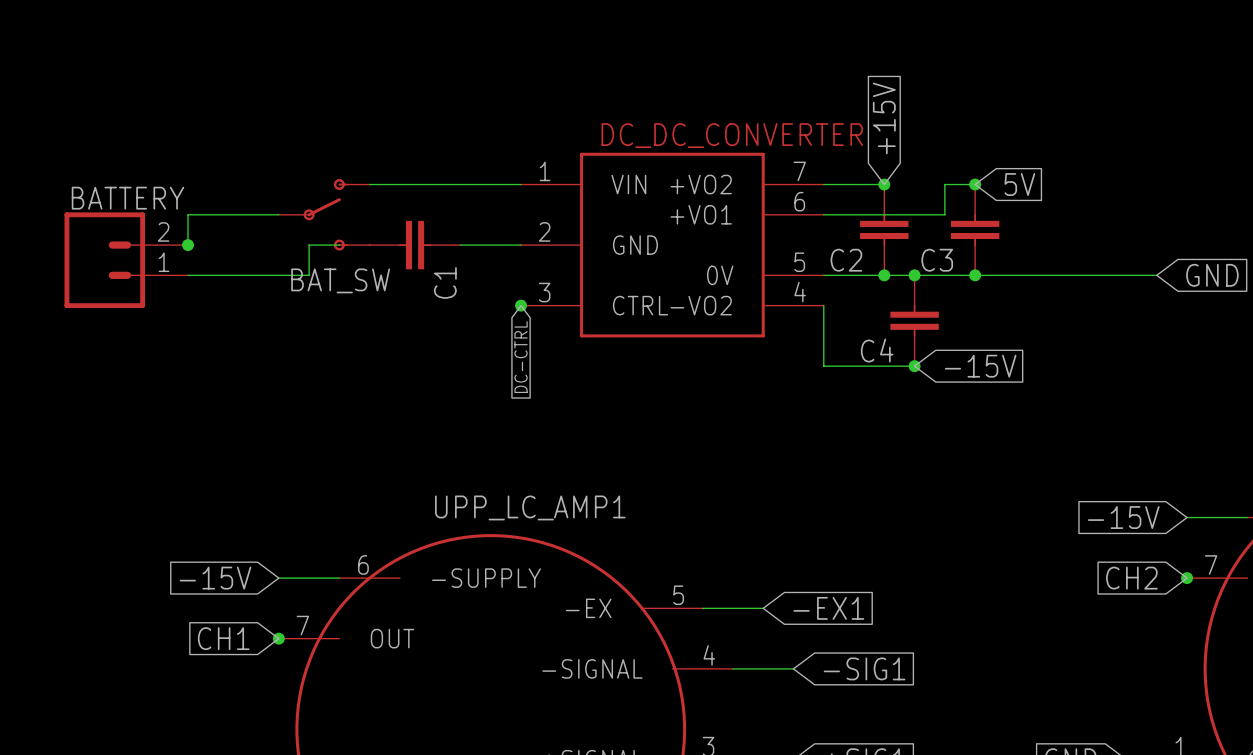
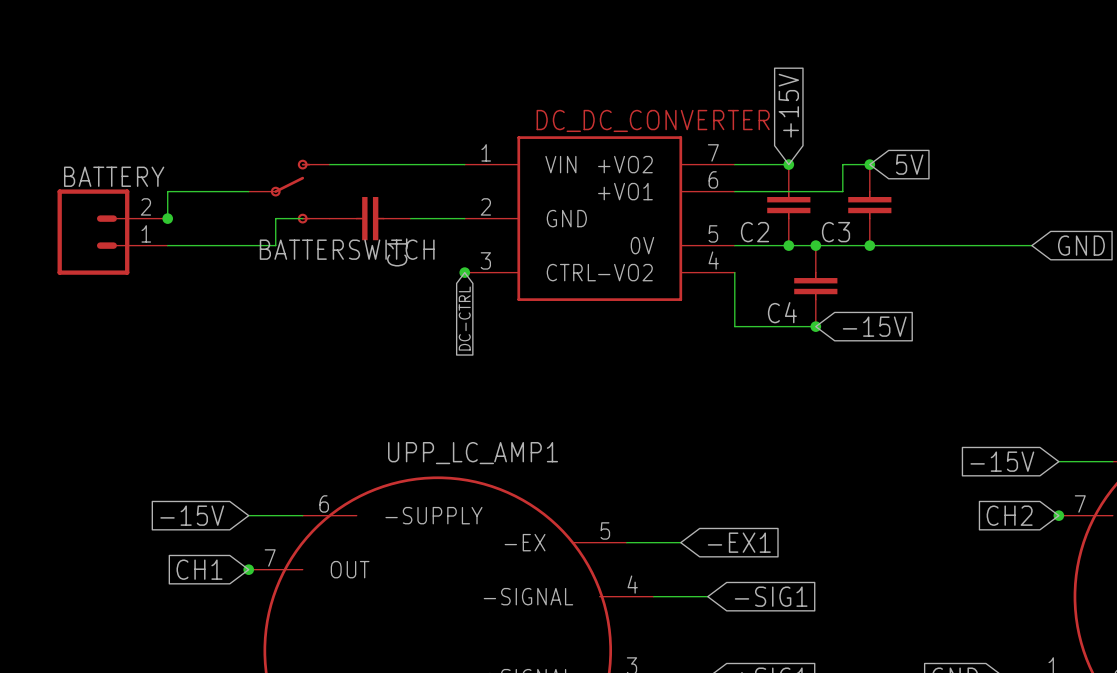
BAT_SW name: BAT_SW (340, 280) -> BATTERSWITCH (347, 249)

